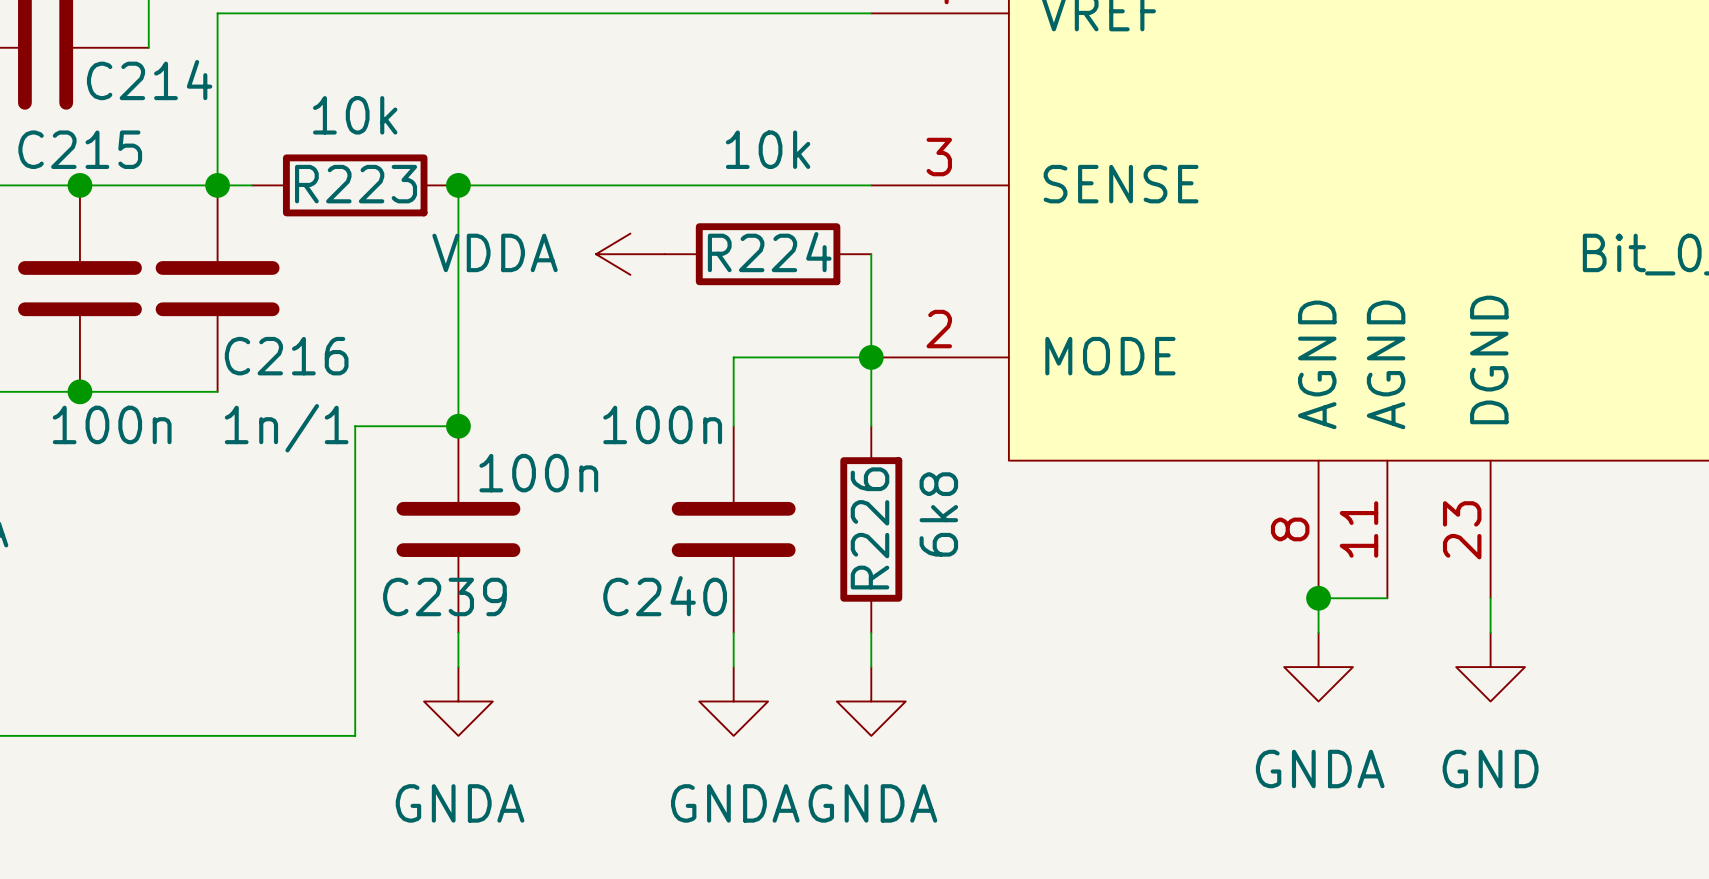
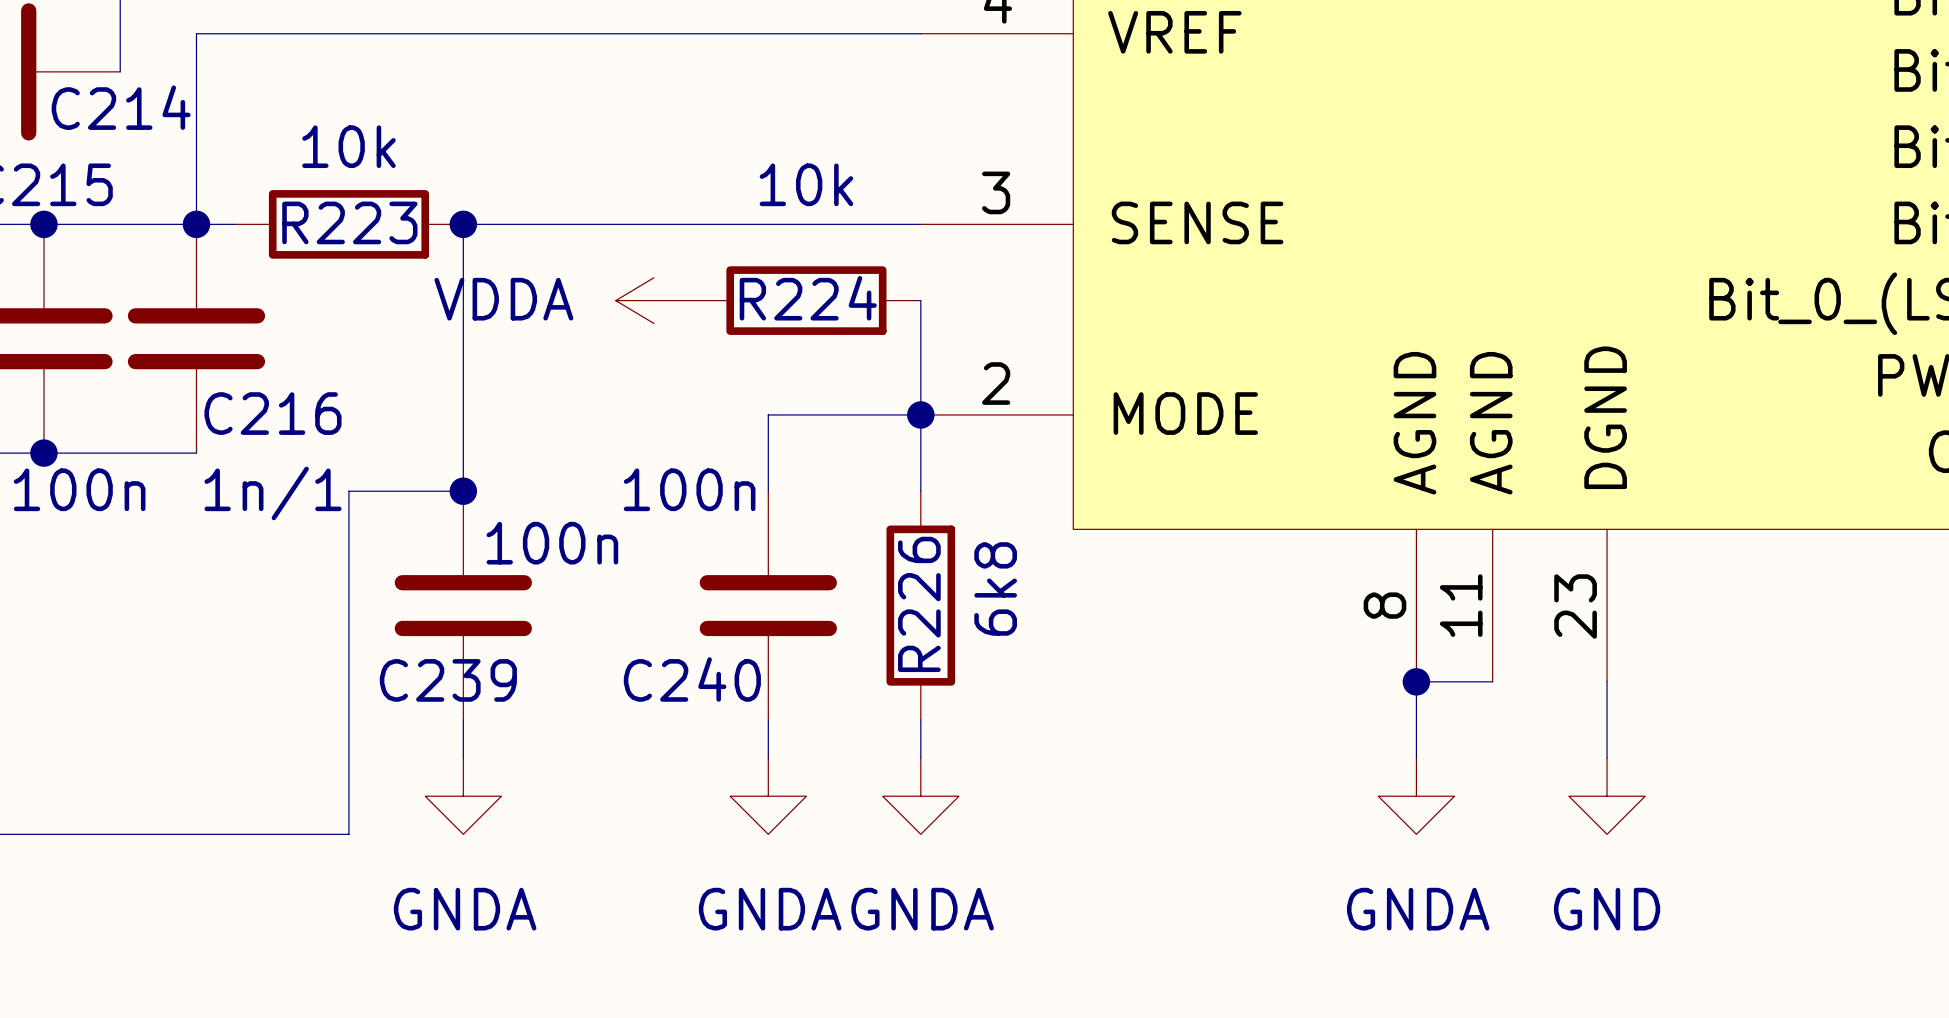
power symbol position: GNDA (1318, 667) -> GNDA (1416, 796)
power symbol position: GND (1490, 667) -> GND (1607, 796)

